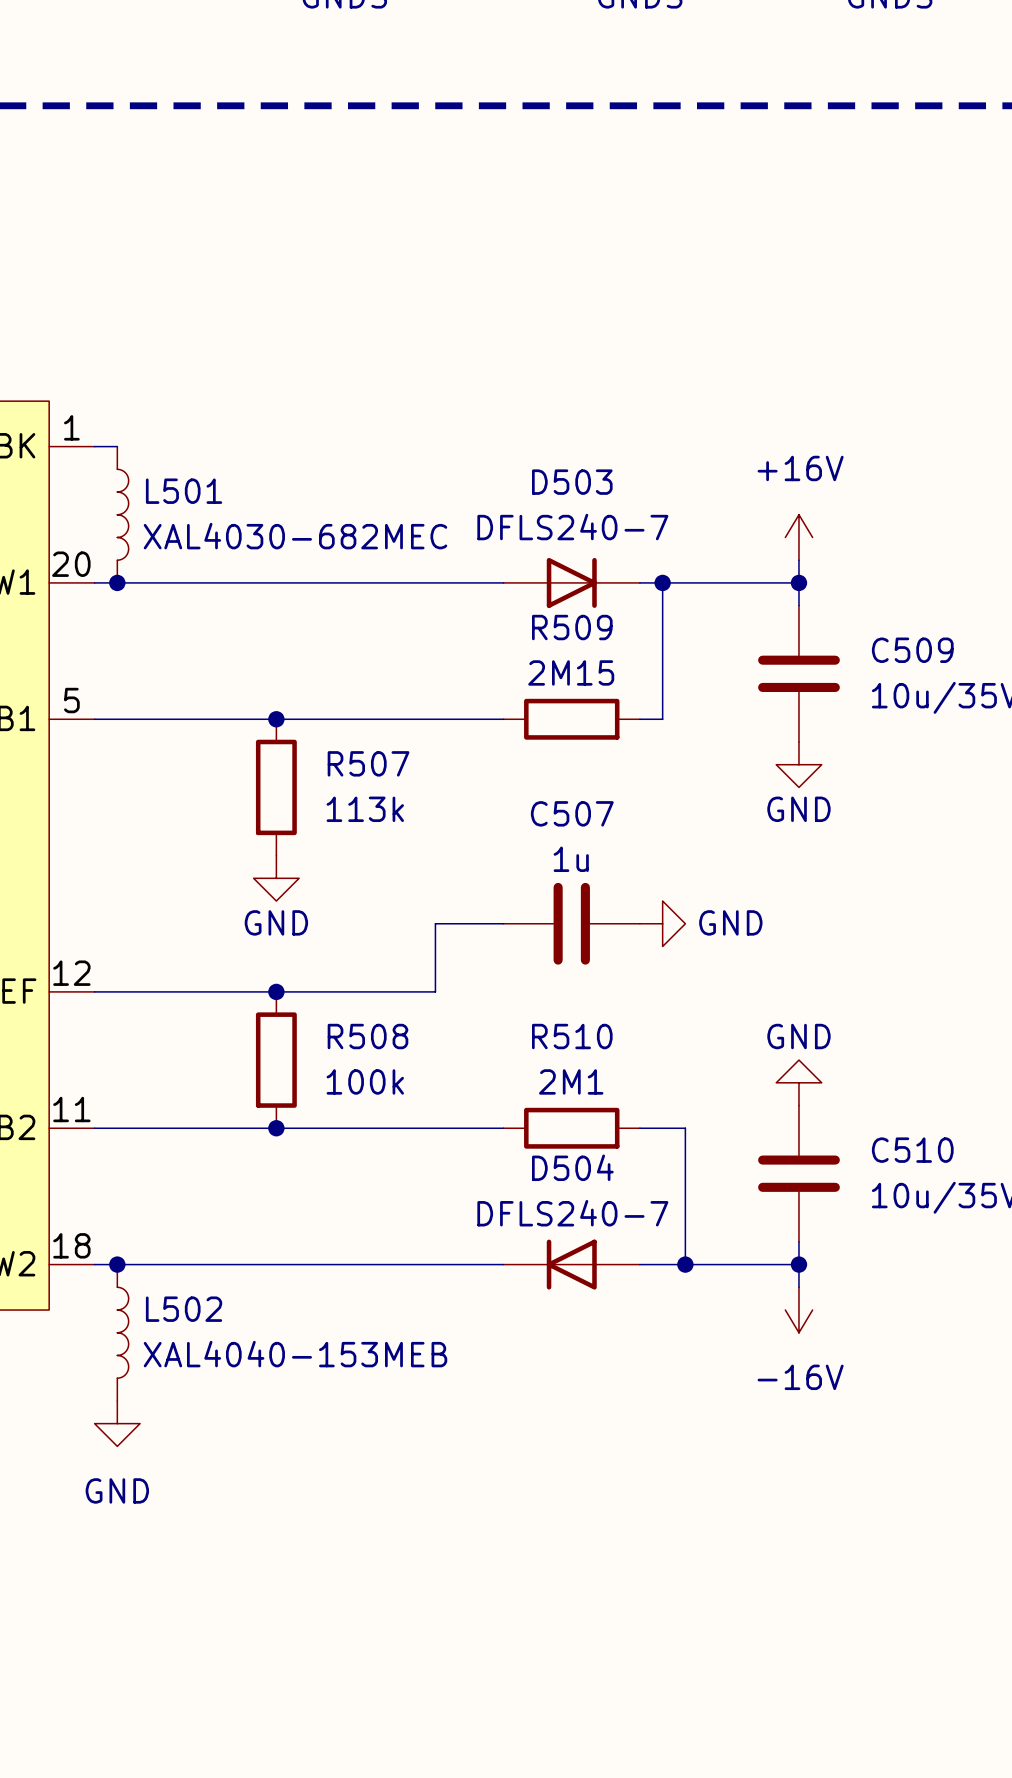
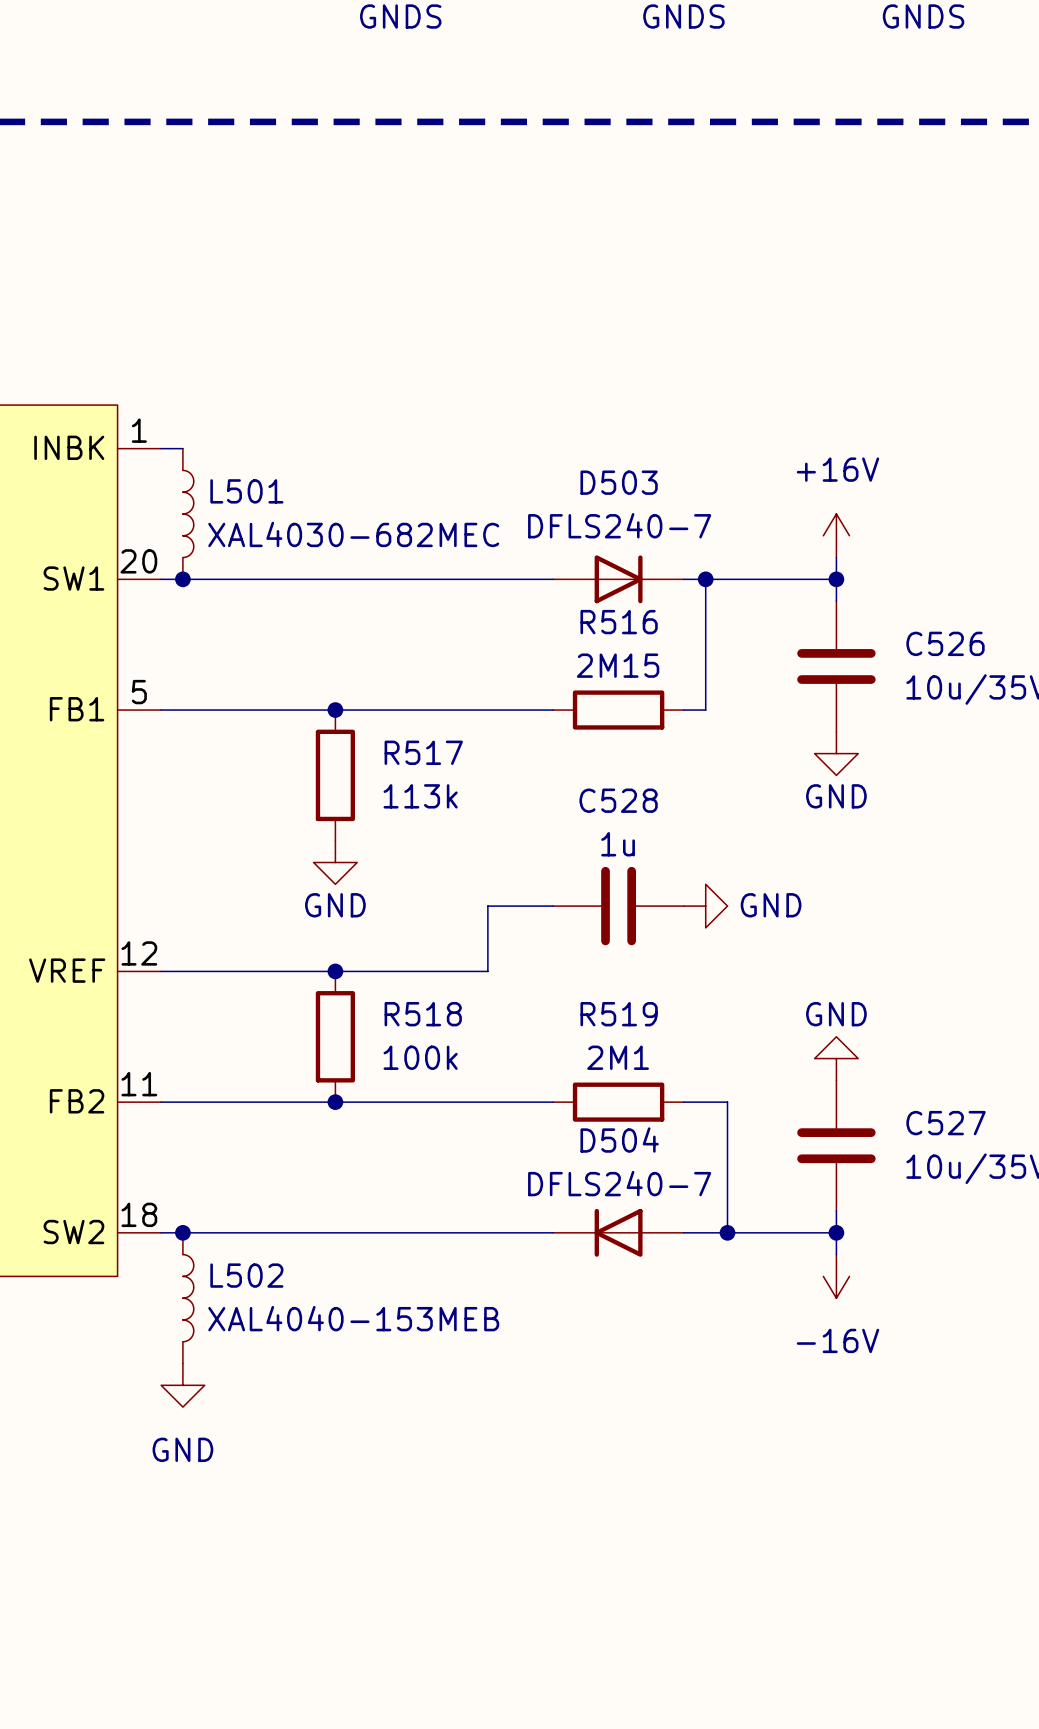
R509 name: R509 (572, 627) -> R516 (619, 622)
C509 name: C509 (912, 650) -> C526 (945, 643)
R507 name: R507 (368, 763) -> R517 (423, 752)
C507 name: C507 (572, 813) -> C528 (618, 800)
R508 name: R508 (367, 1036) -> R518 (423, 1014)
R510 name: R510 (572, 1036) -> R519 (619, 1014)
C510 name: C510 (912, 1150) -> C527 (946, 1123)

